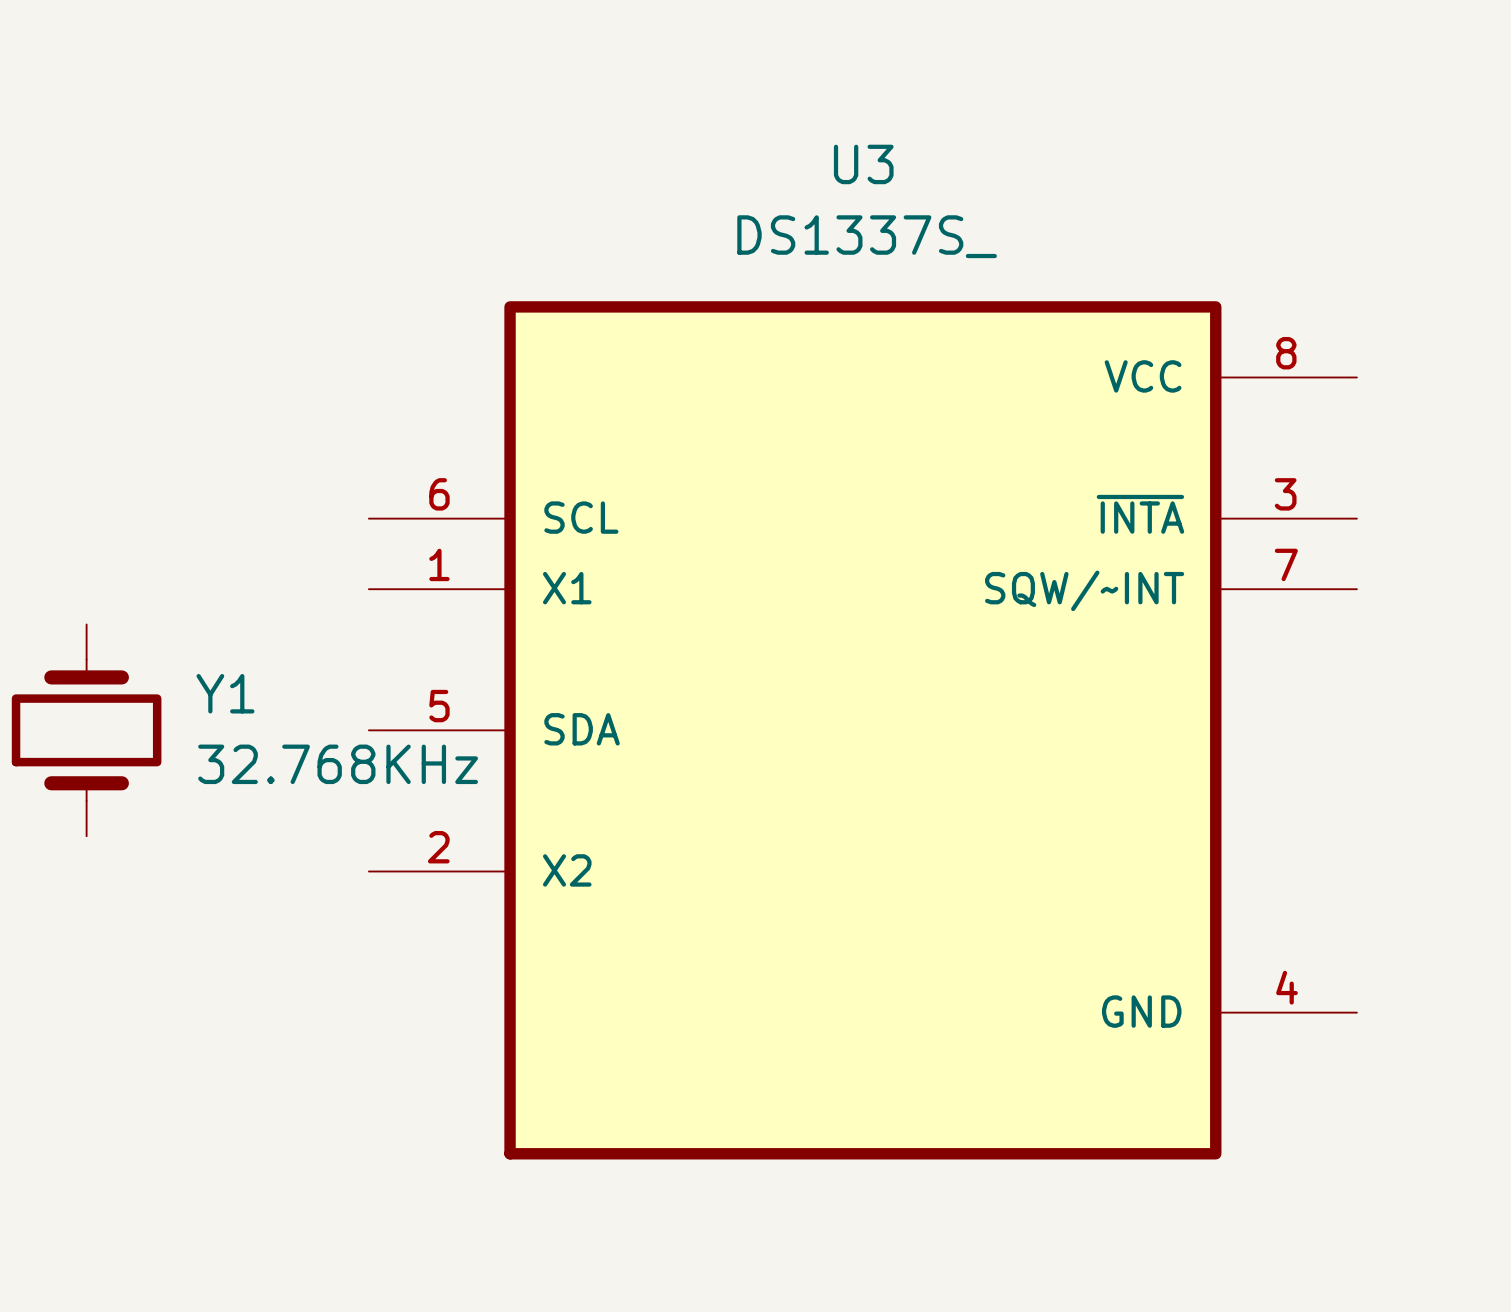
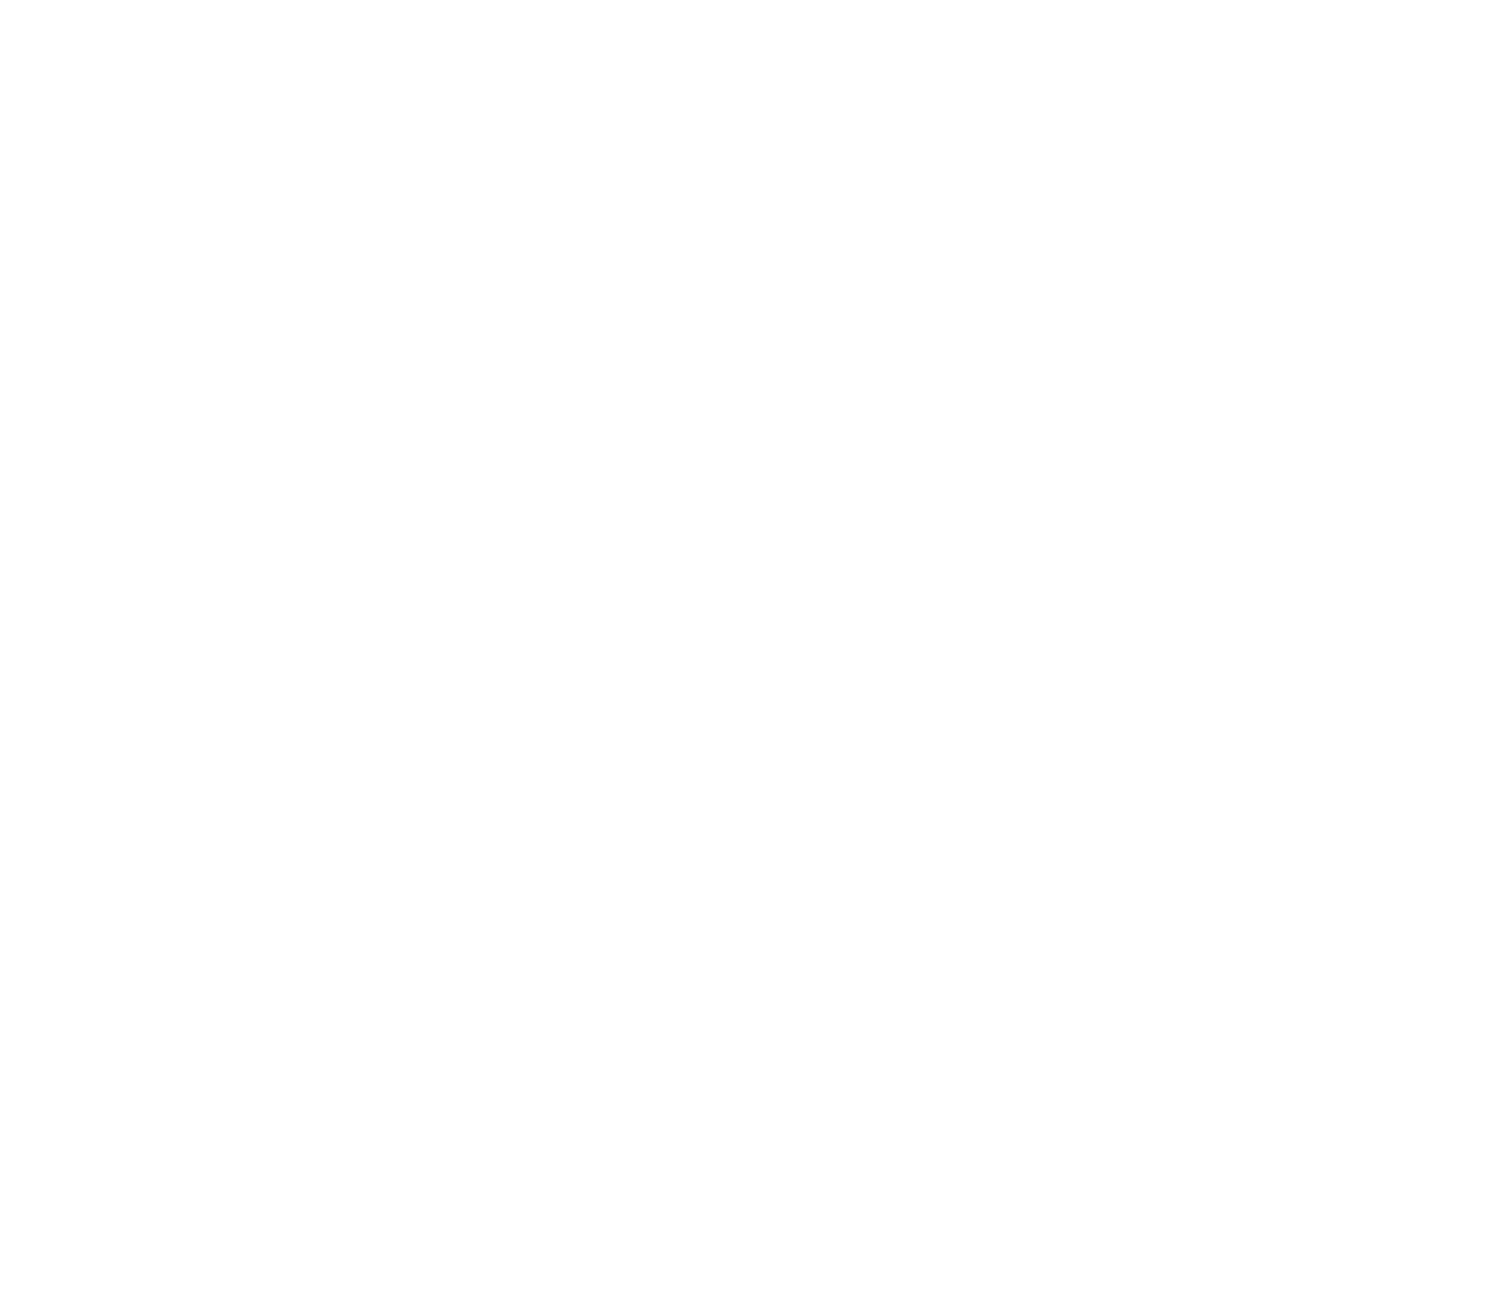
Y1: 32.768KHz (86, 730) -> none
U3: DS1337S_ (862, 730) -> none

